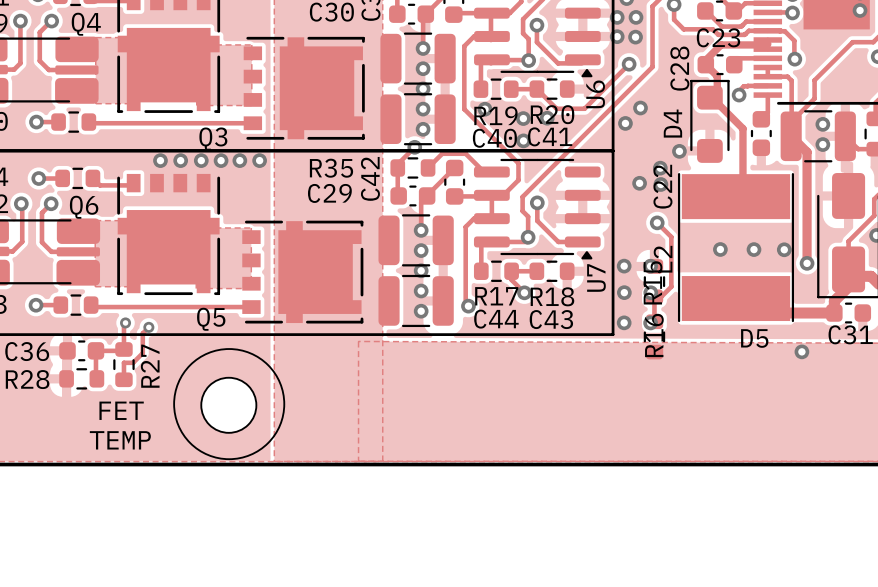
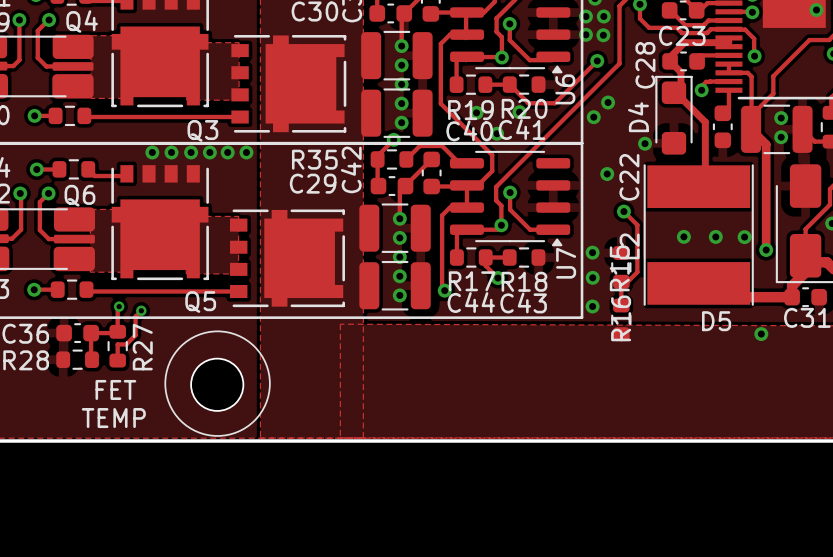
via: (484, 109) -> none
via: none -> (476, 112)
via: (523, 118) -> none
via: (660, 168) -> none
via: (660, 184) -> none
via: (650, 266) -> none
via: (650, 292) -> none
via: (650, 322) -> none

